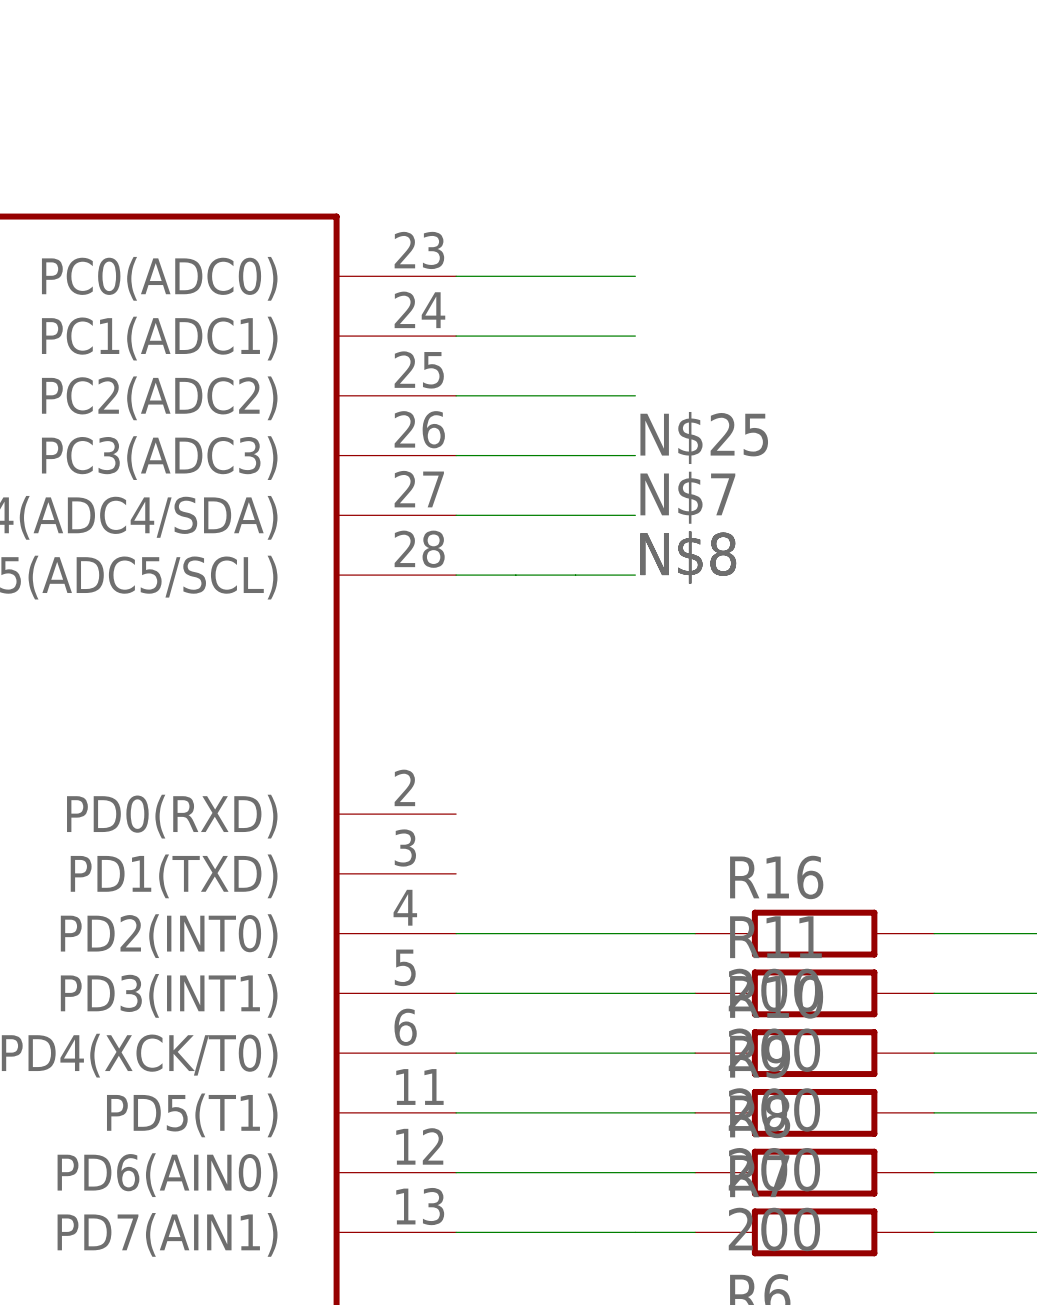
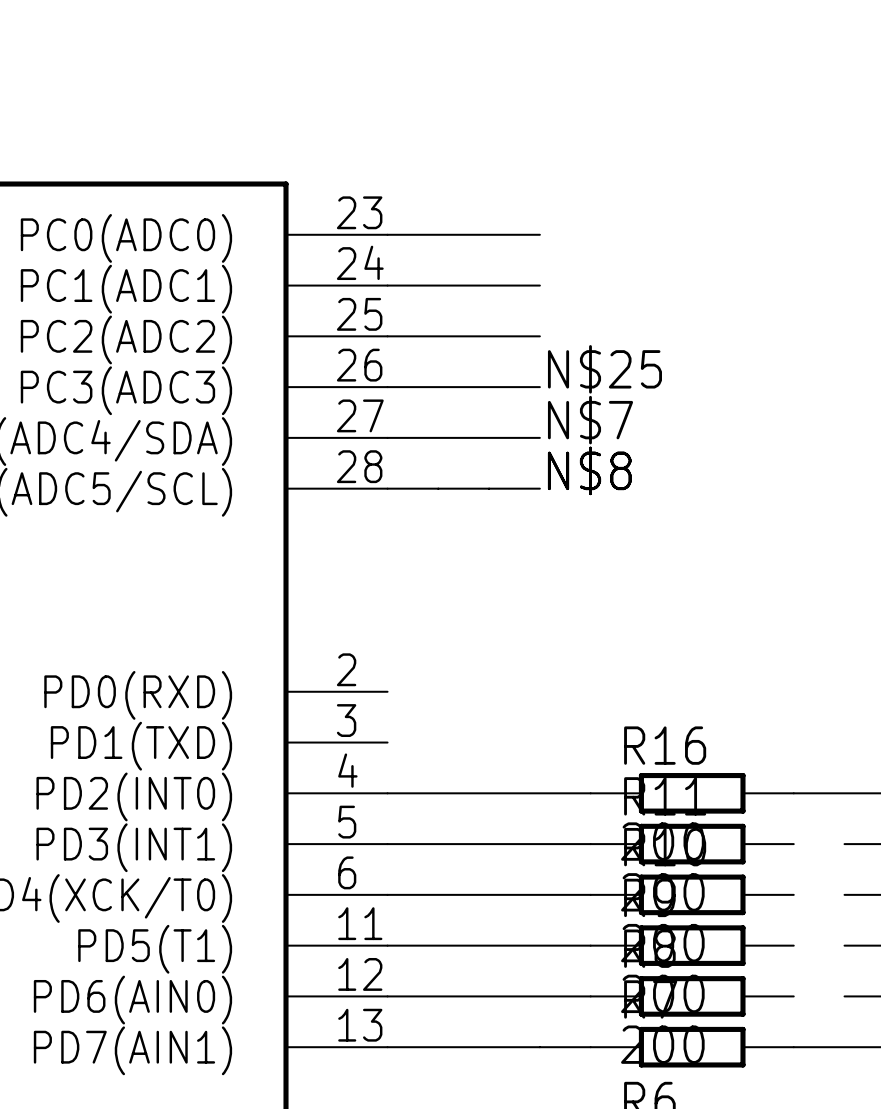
wire: (934, 993) (993, 993) -> none
wire: (934, 1053) (993, 1053) -> none
wire: (934, 1112) (993, 1112) -> none
wire: (934, 1172) (993, 1172) -> none

